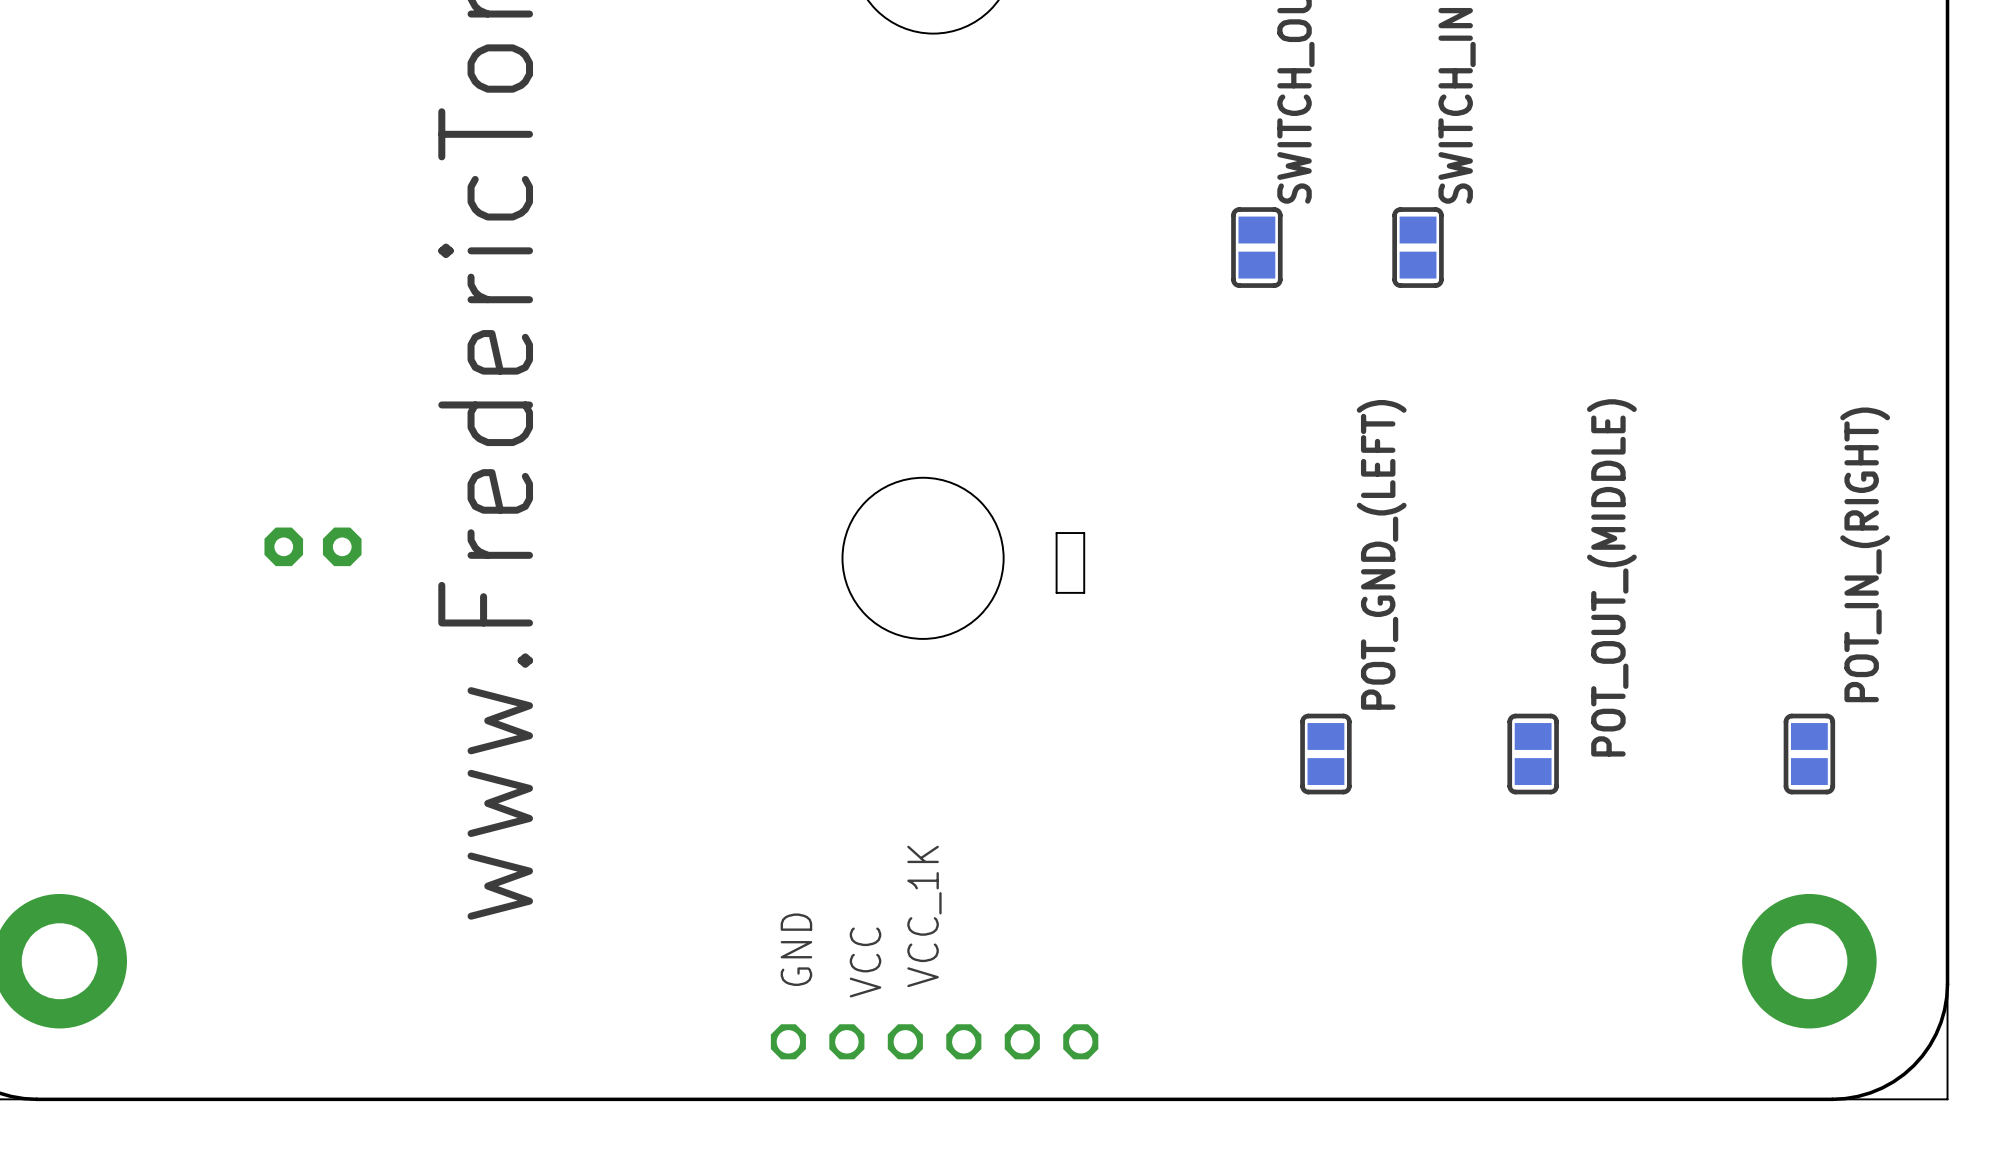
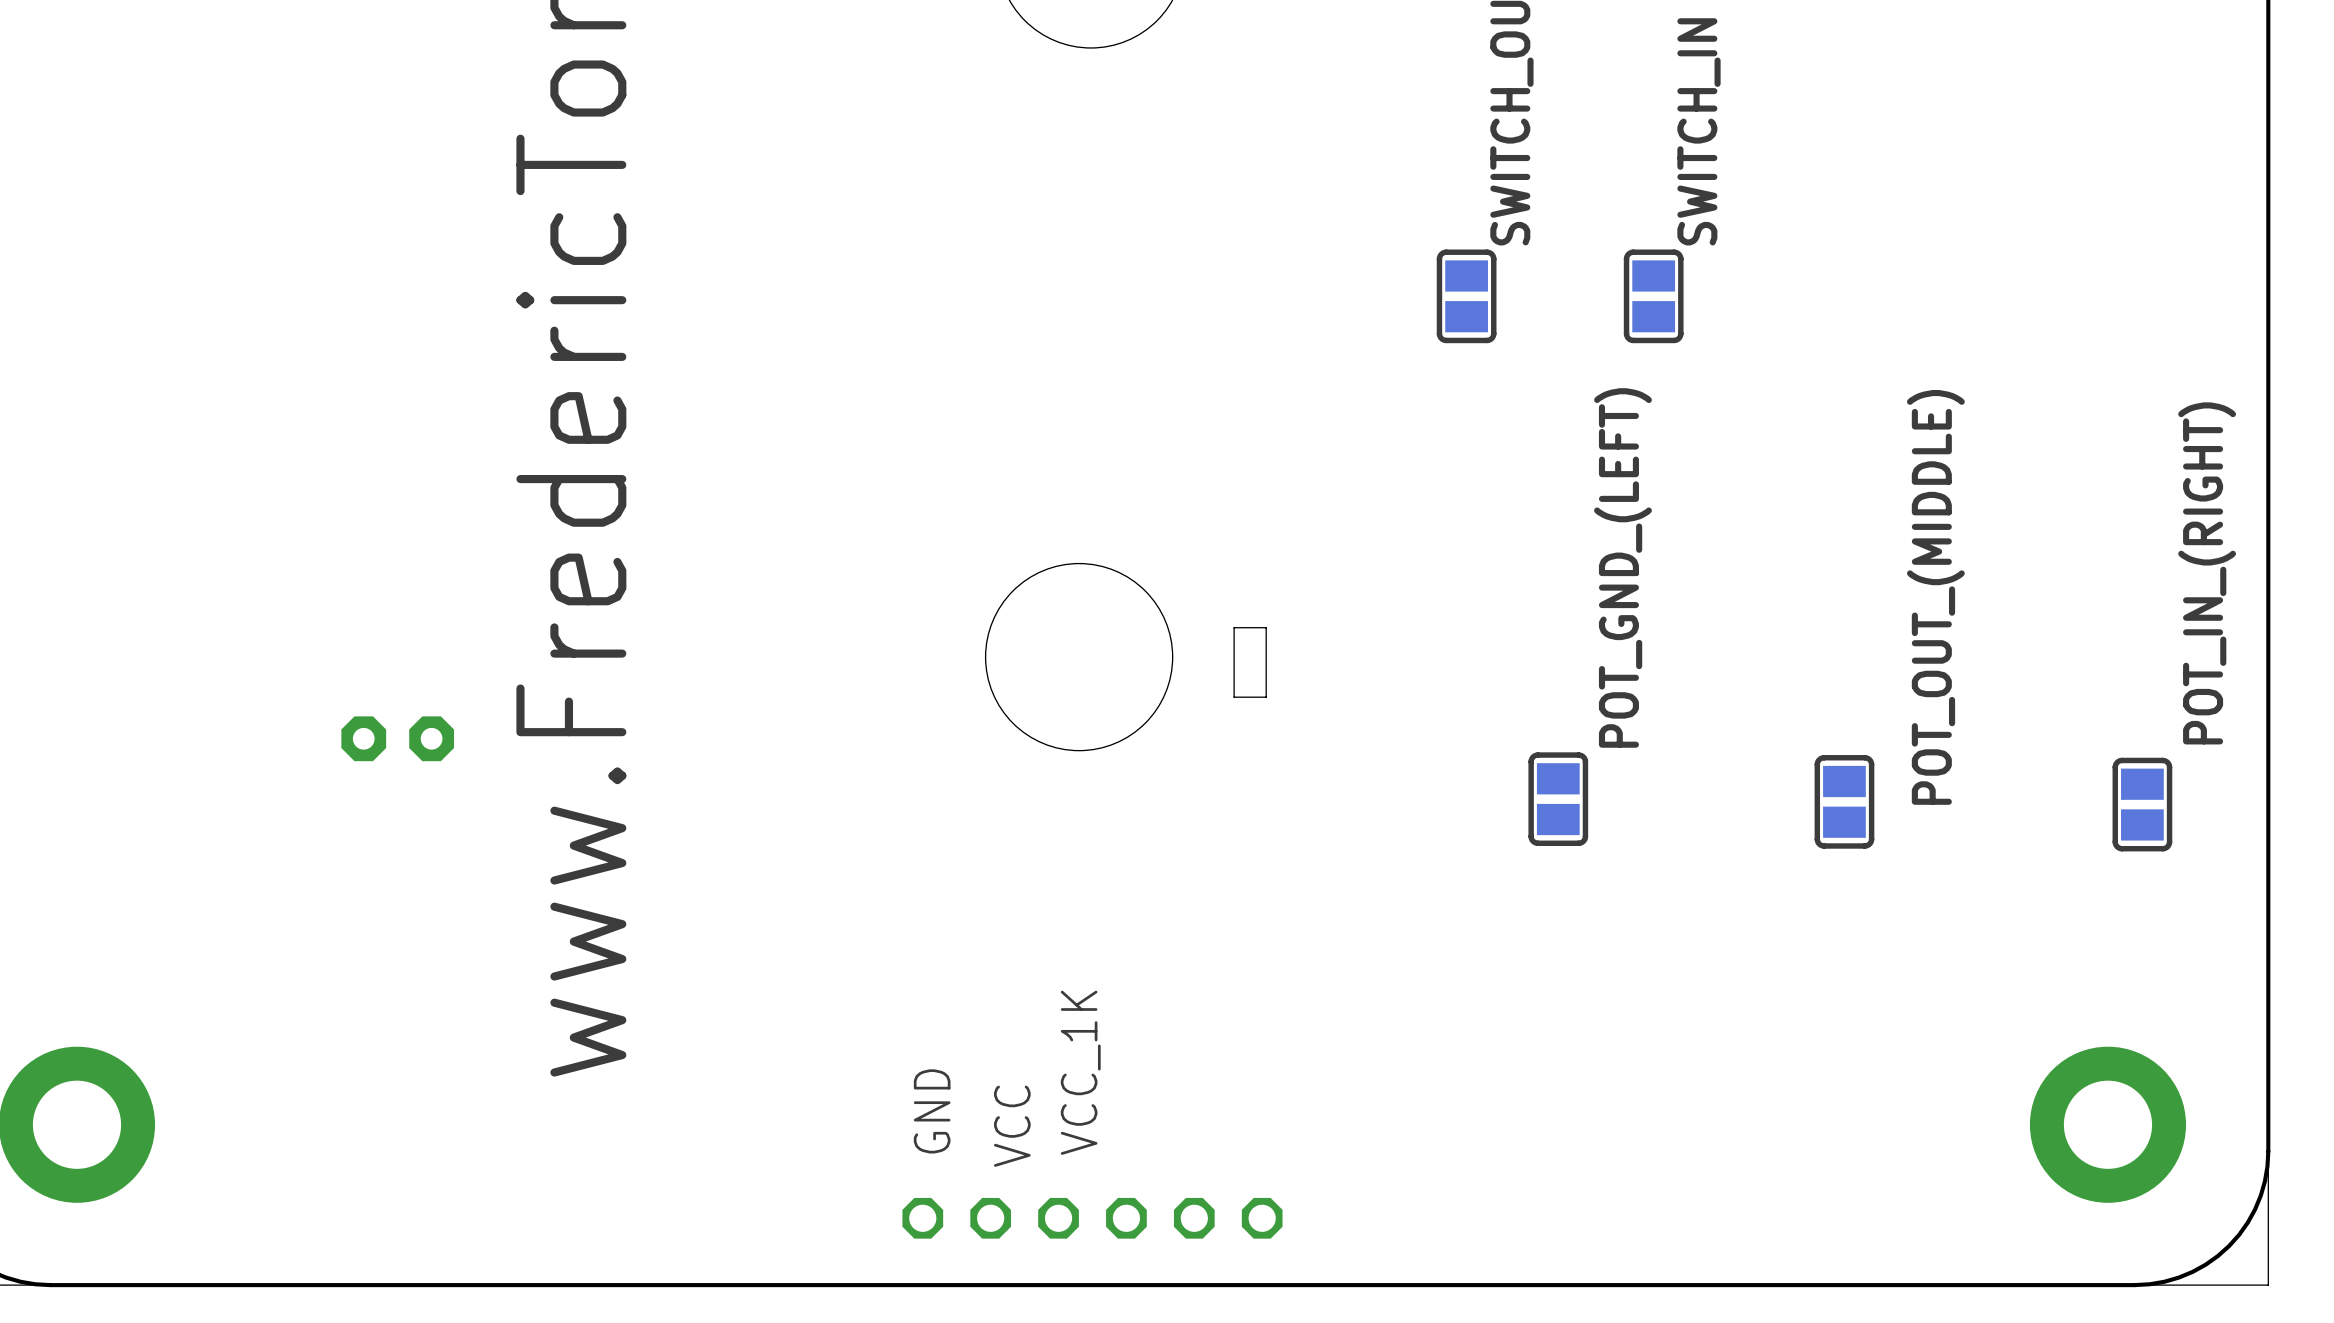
part position: (312, 546) -> (397, 738)
POT_GND_(LEFT) position: (1325, 754) -> (1558, 799)
POT_OUT_(MIDDLE) position: (1533, 754) -> (1844, 801)
POT_IN_(RIGHT) position: (1809, 754) -> (2142, 804)

